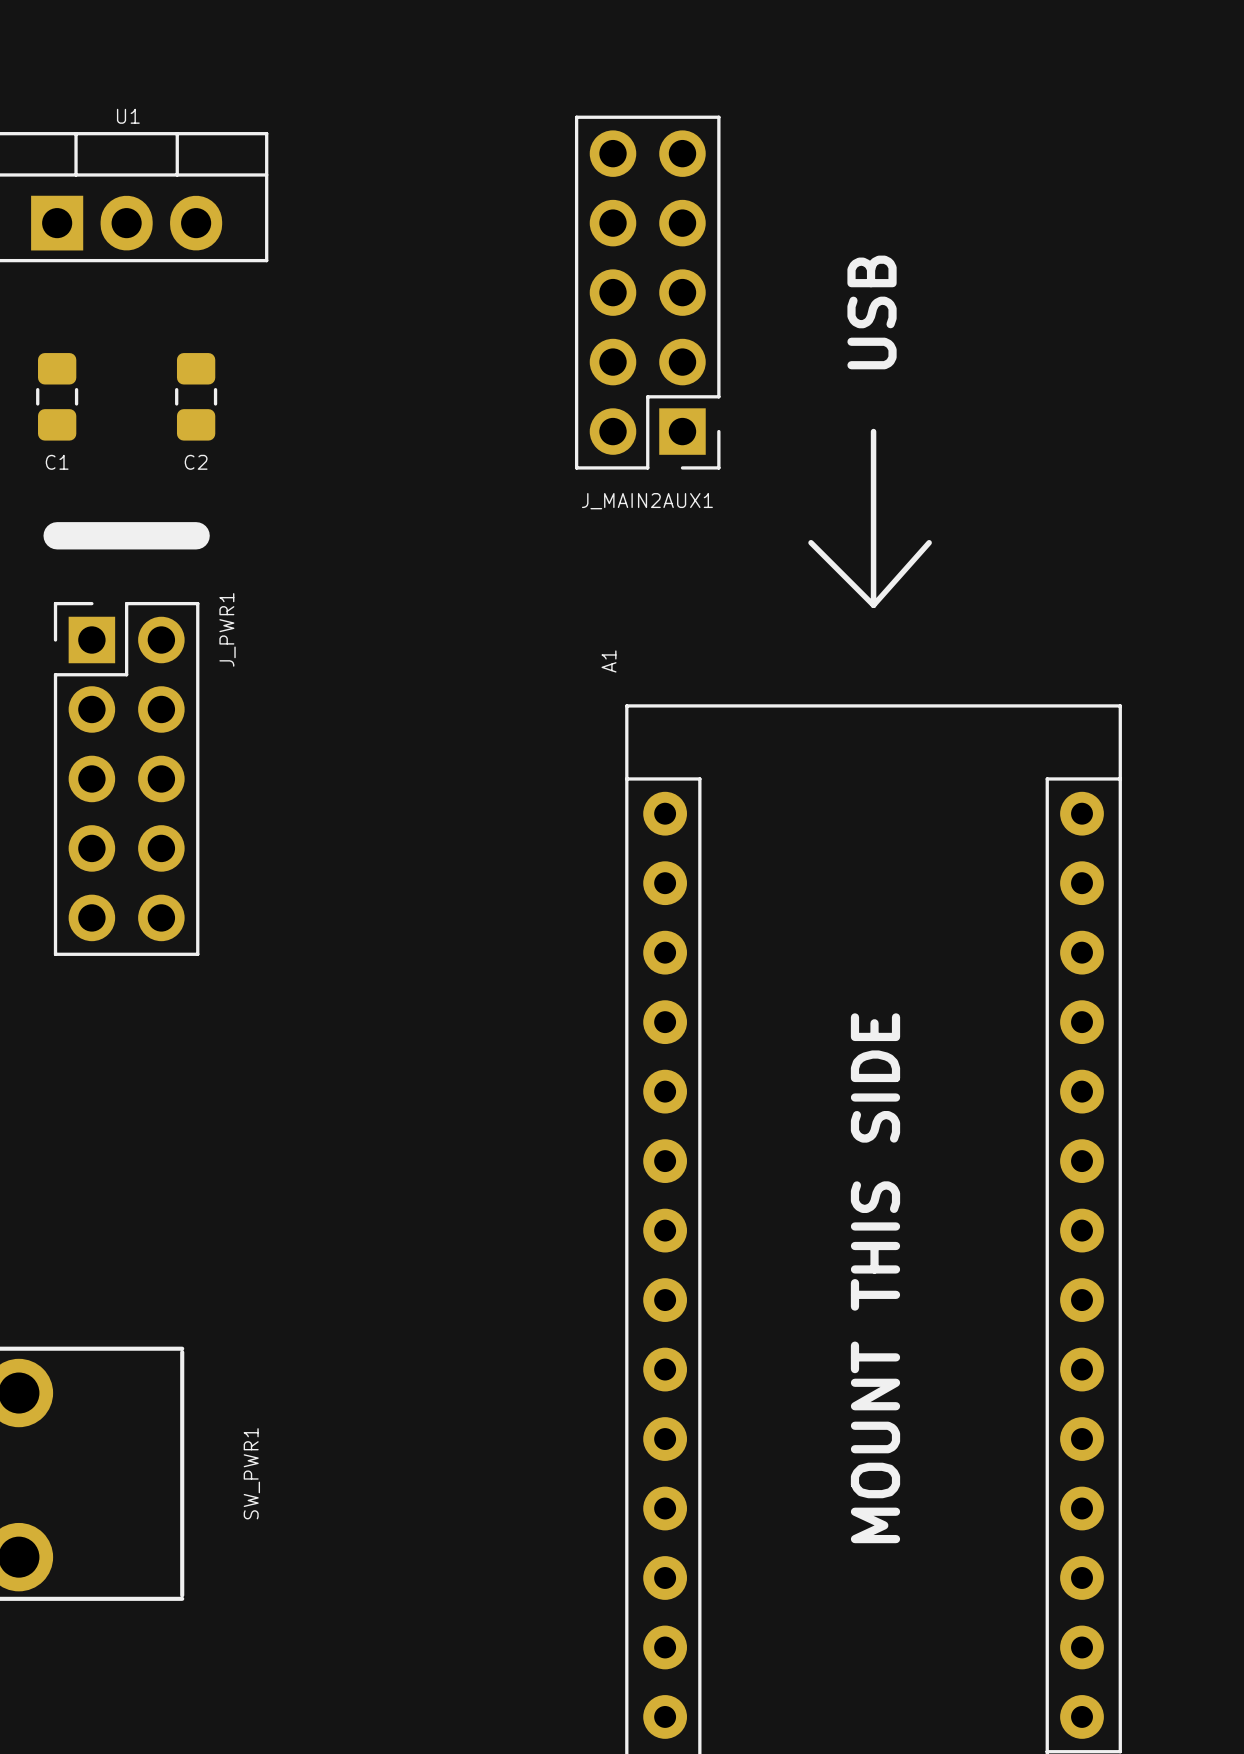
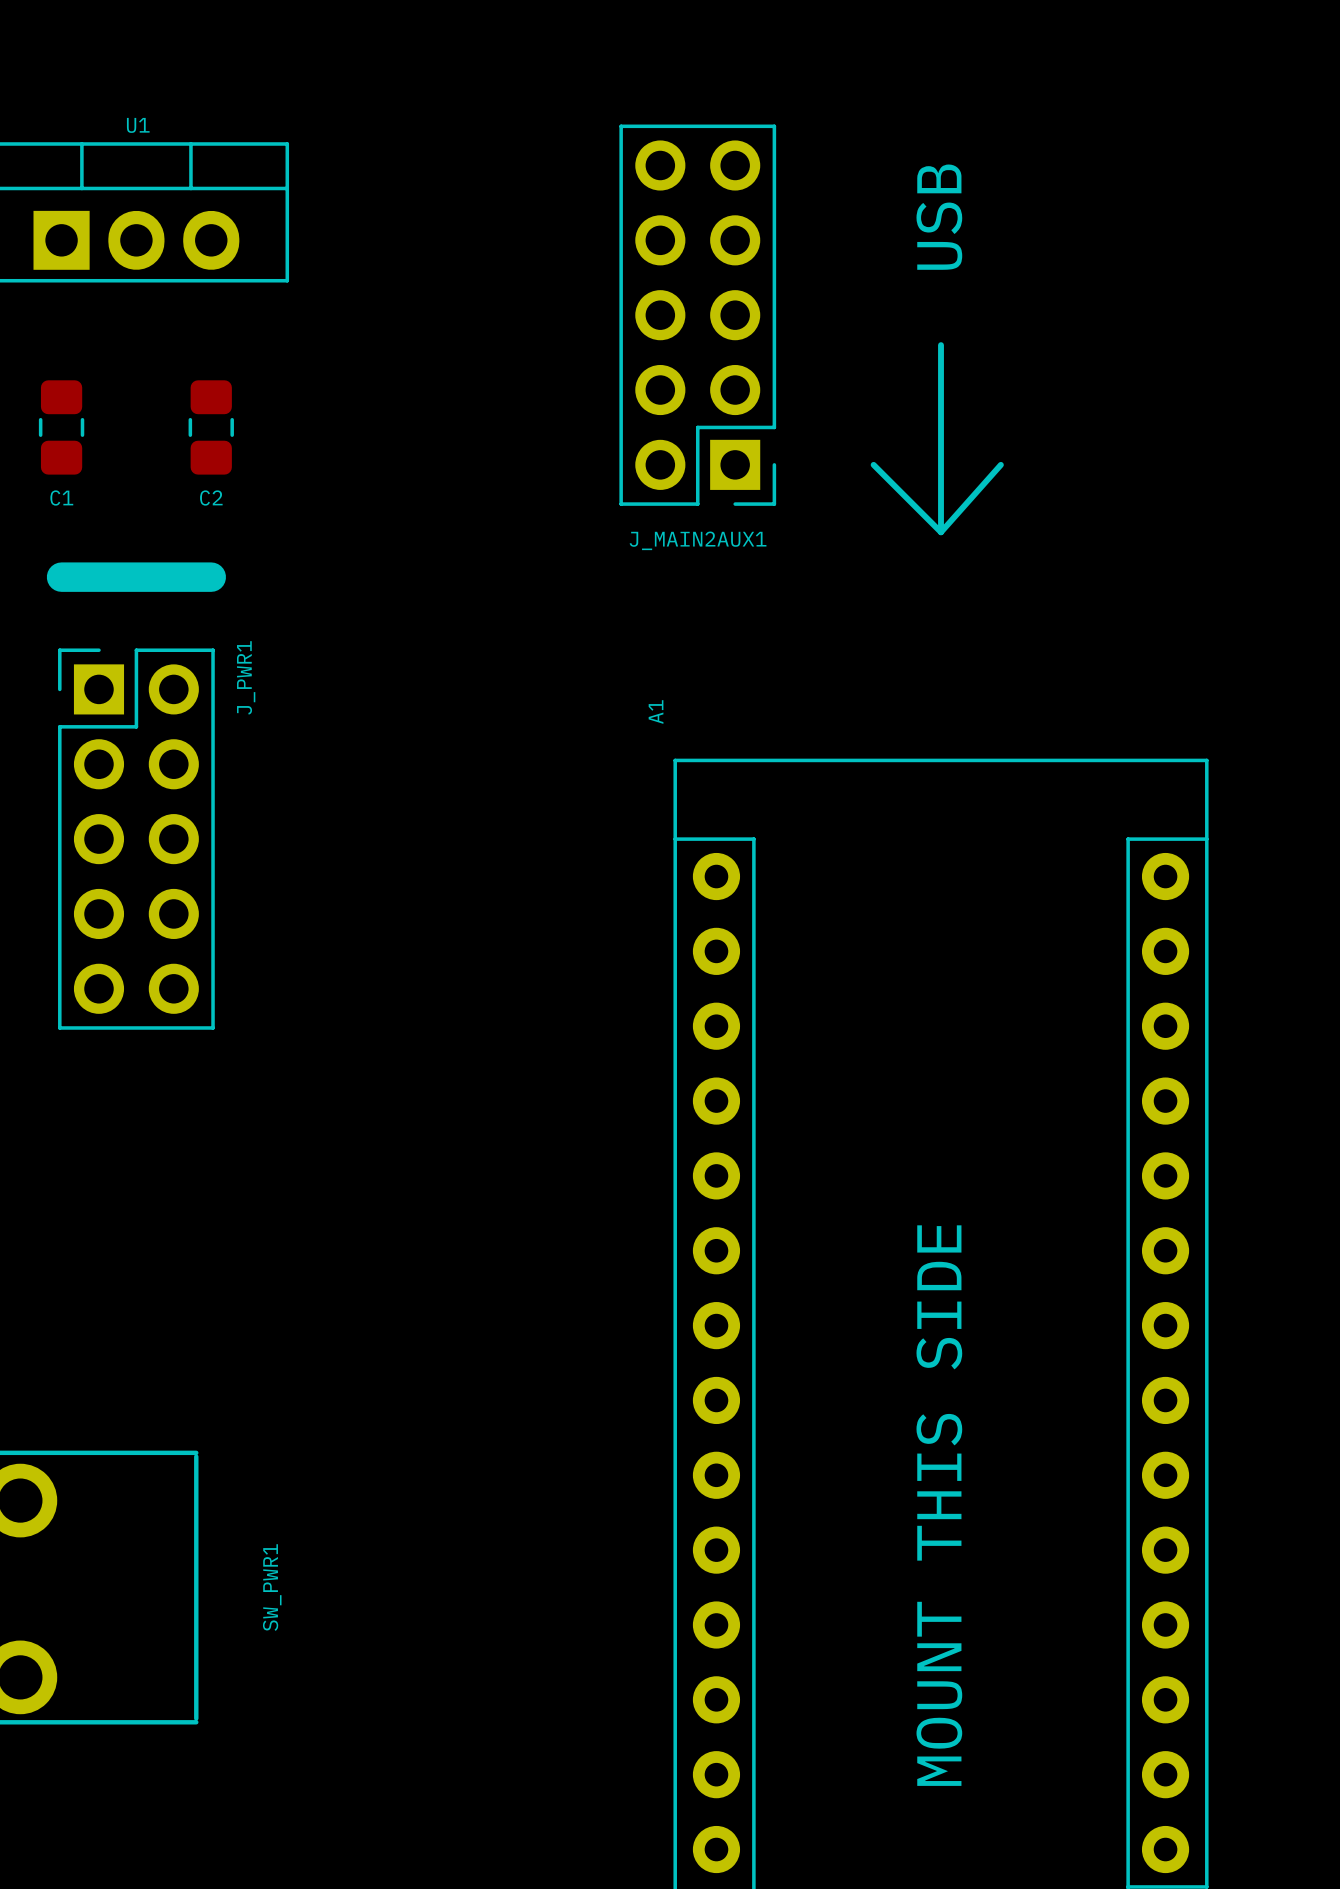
text position: USB (872, 312) -> USB (939, 217)
line: none -> (873, 464) (941, 532) (1000, 464)
line: (873, 494) (873, 605) -> (941, 345) (941, 464)
line: (811, 542) (873, 605) -> none
line: (929, 542) (873, 605) -> none
text position: MOUNT THIS SIDE (875, 1278) -> MOUNT THIS SIDE (939, 1505)

